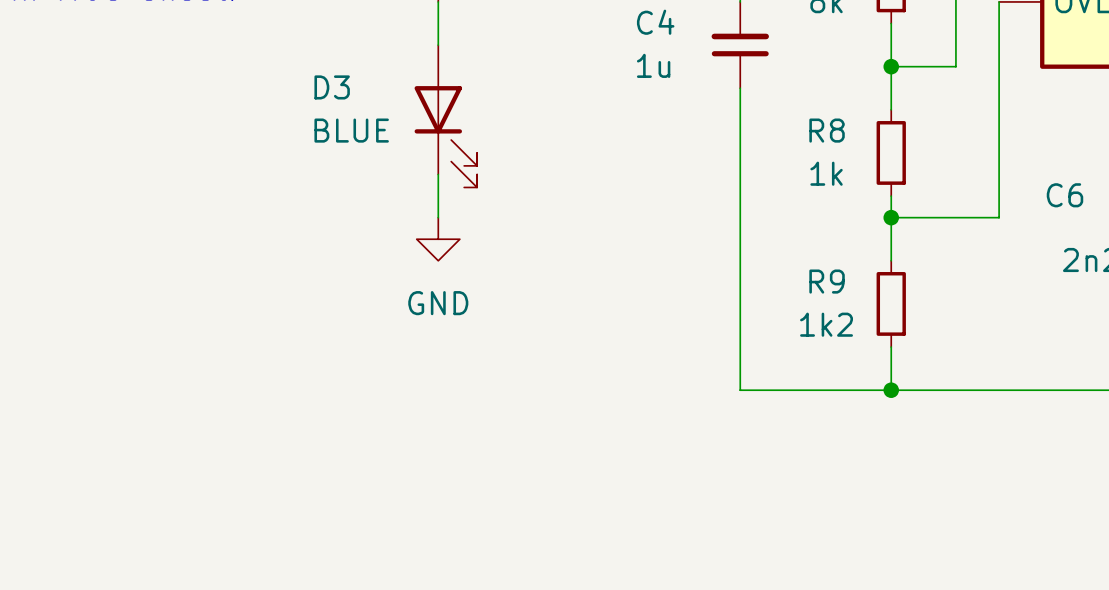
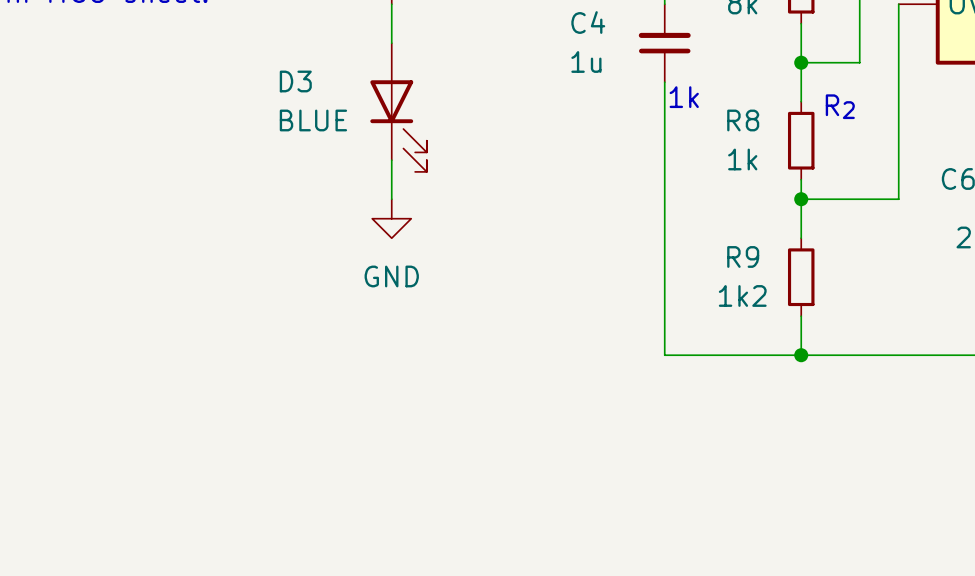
text: none -> 1k (684, 97)
text: none -> R2 (840, 106)

